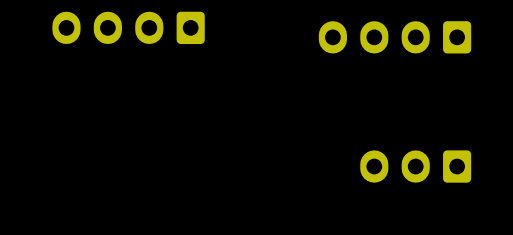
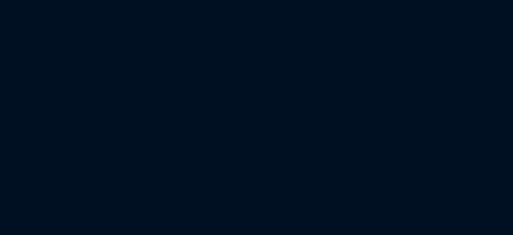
part: (128, 27) -> none
part: (395, 37) -> none
part: (415, 166) -> none

